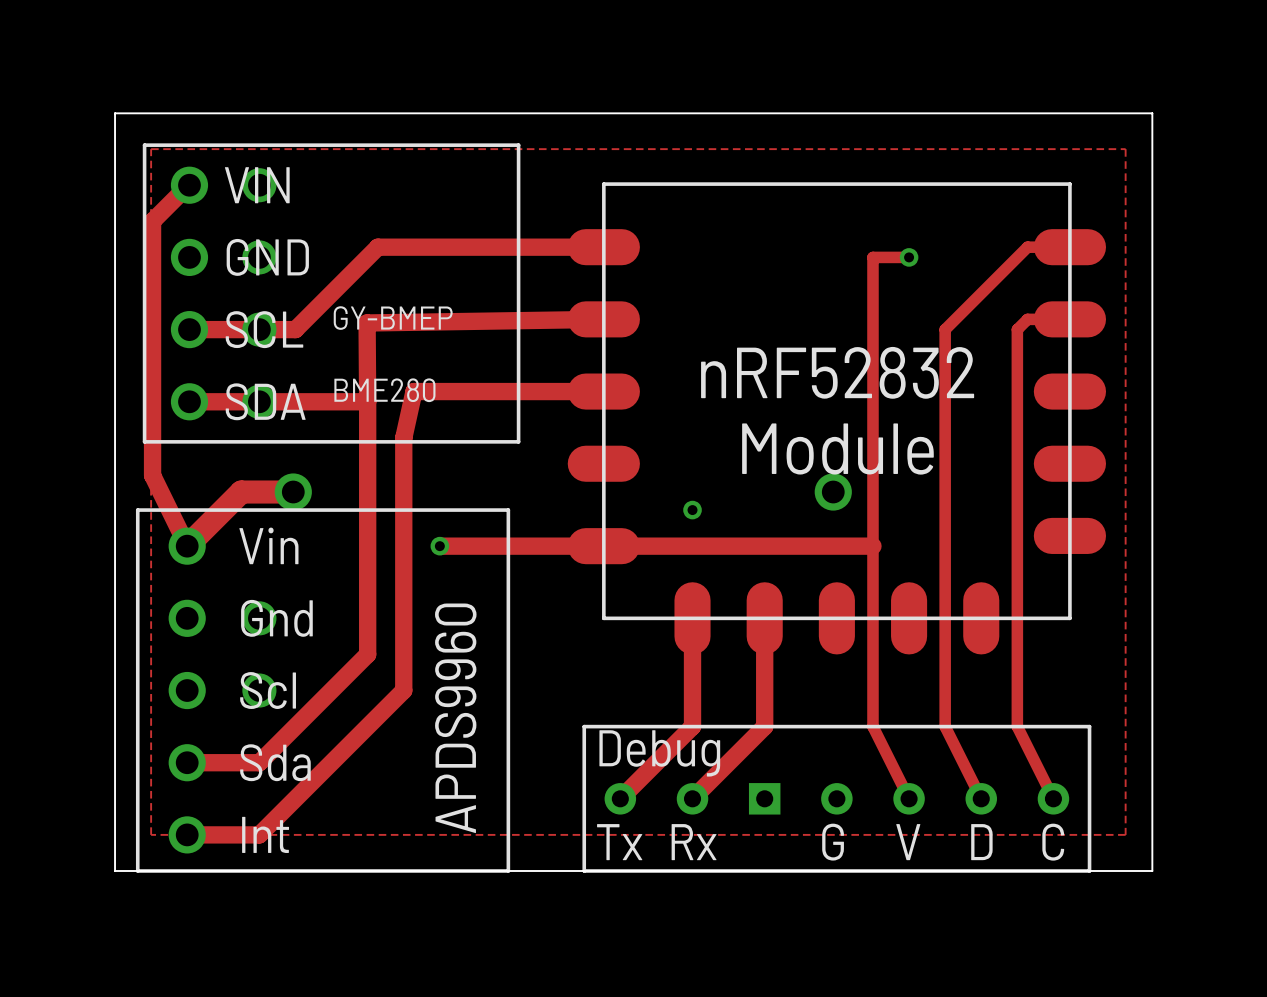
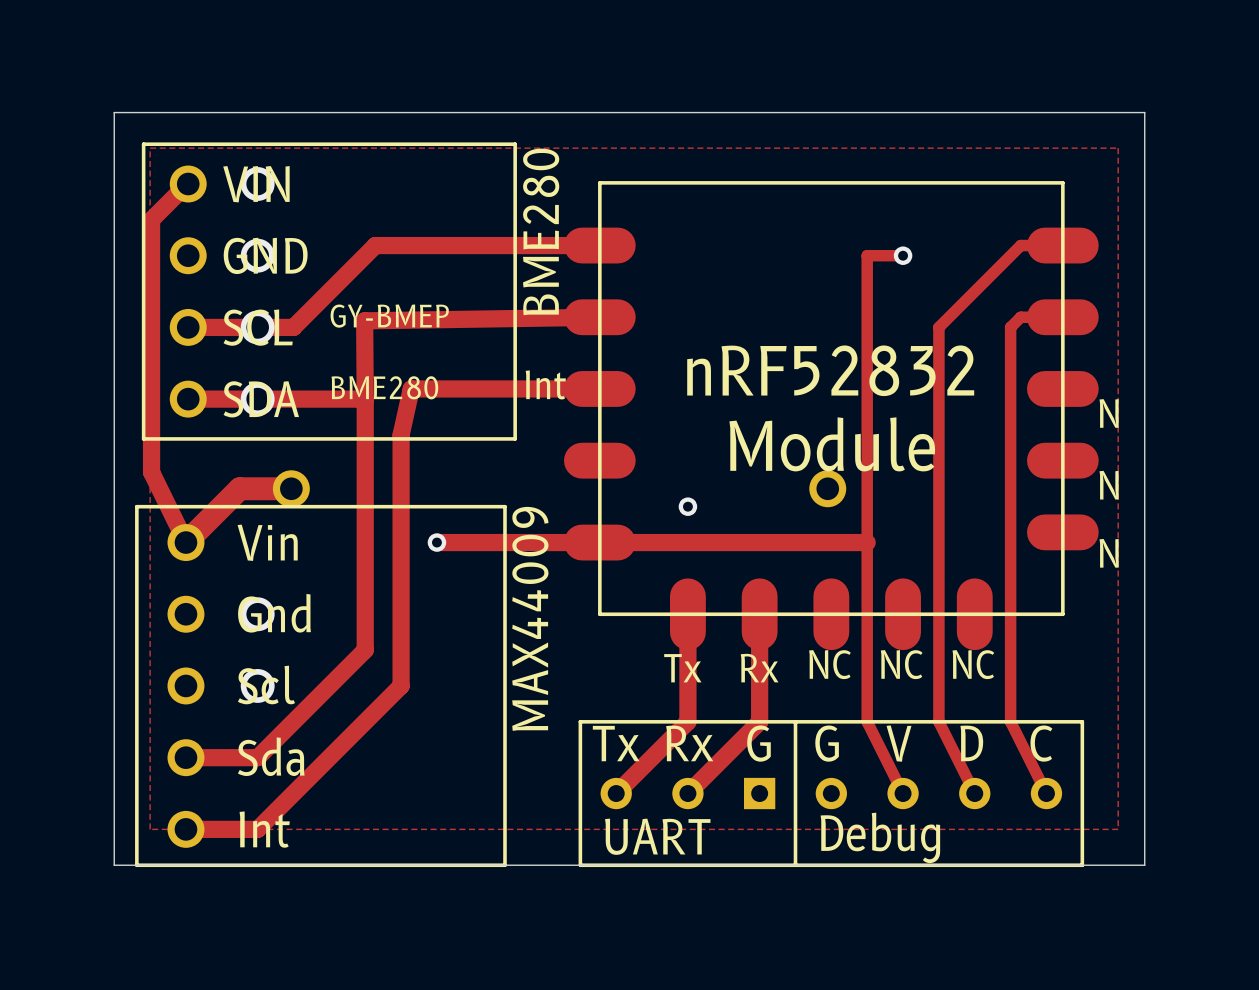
text: none -> BME280 (541, 231)
text: none -> Int (545, 384)
text: none -> N (1109, 413)
text: none -> N (1109, 485)
text: none -> N (1109, 553)
text: none -> MAX44009 (530, 618)
text: none -> NC (829, 664)
text: none -> NC (901, 664)
text: none -> NC (973, 664)
text: none -> Tx (682, 668)
text: none -> Rx (759, 668)
part text: APDS9960 (455, 718) -> none
part footprint: [582, 724, 1092, 873] -> [578, 720, 1085, 868]

